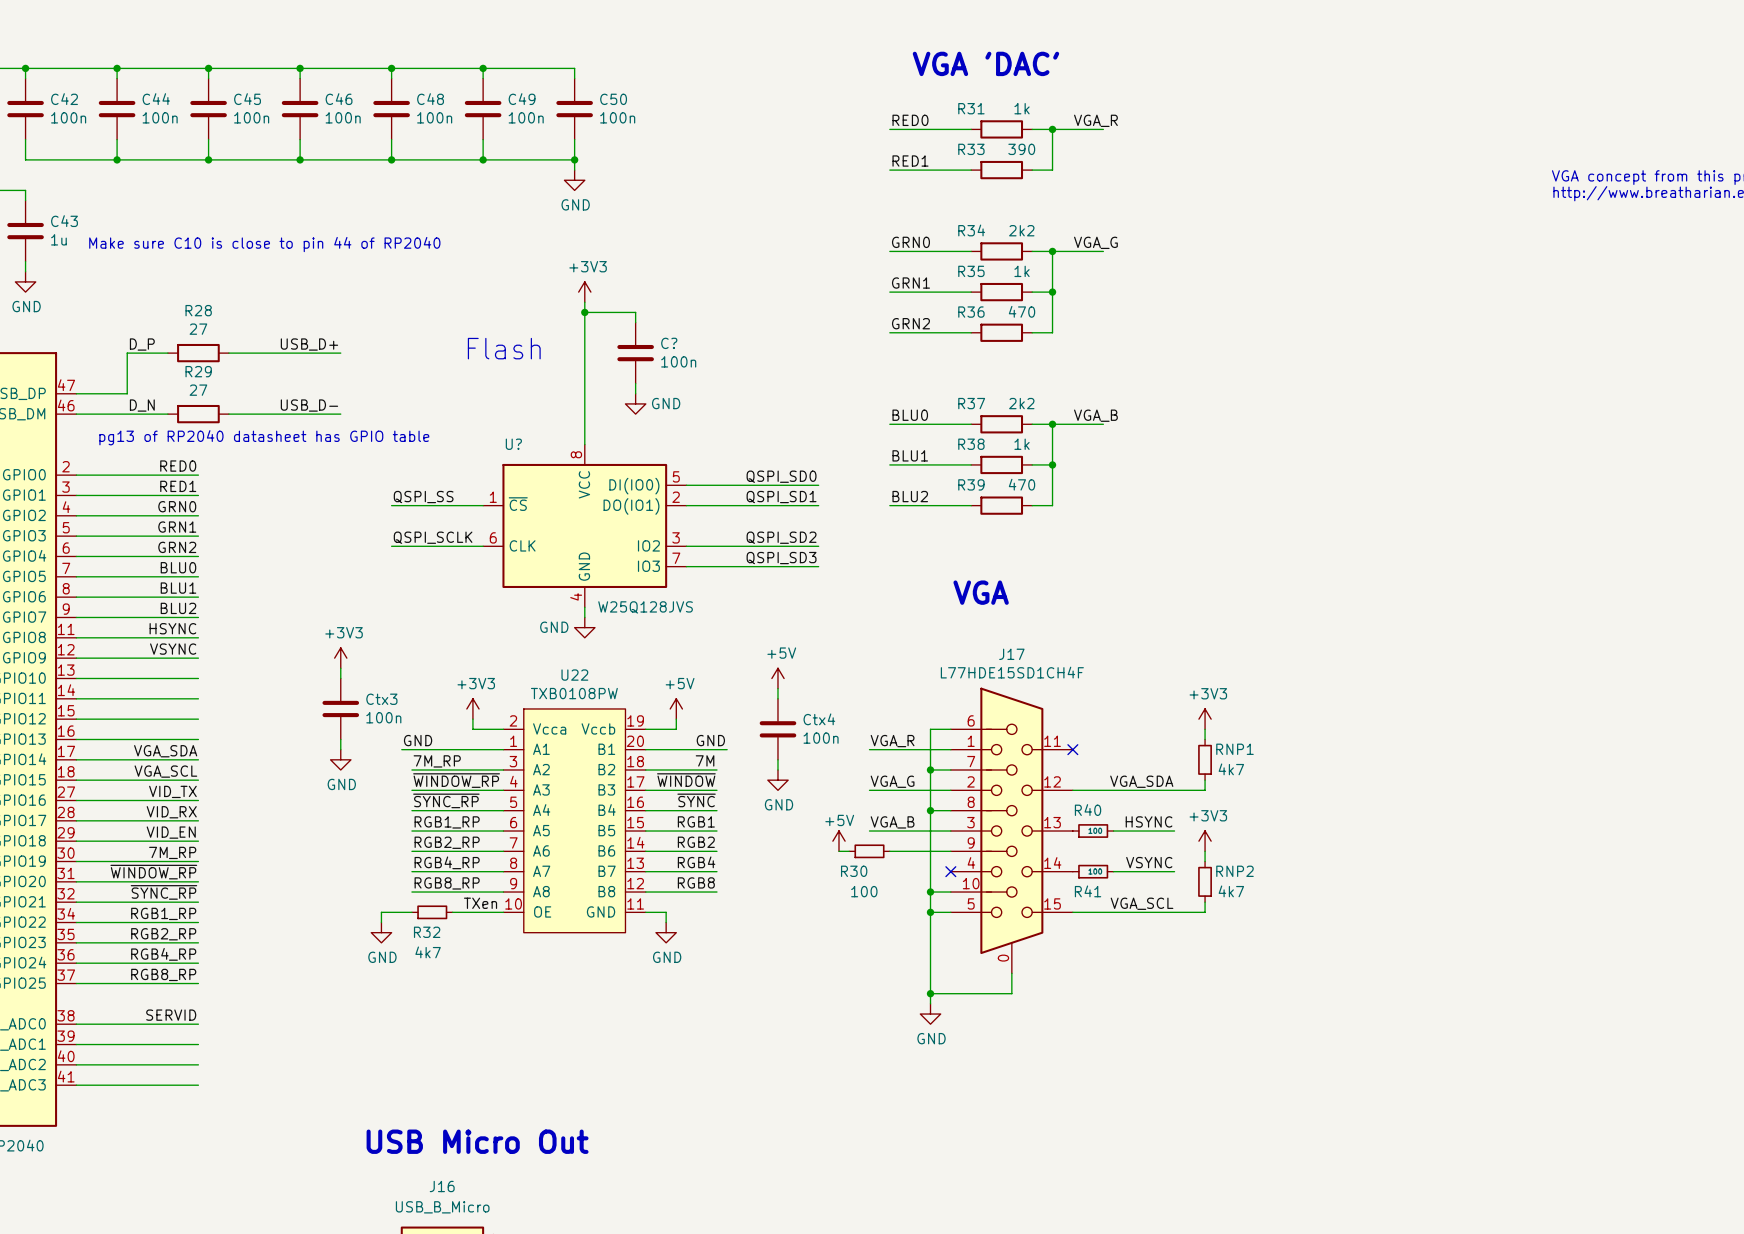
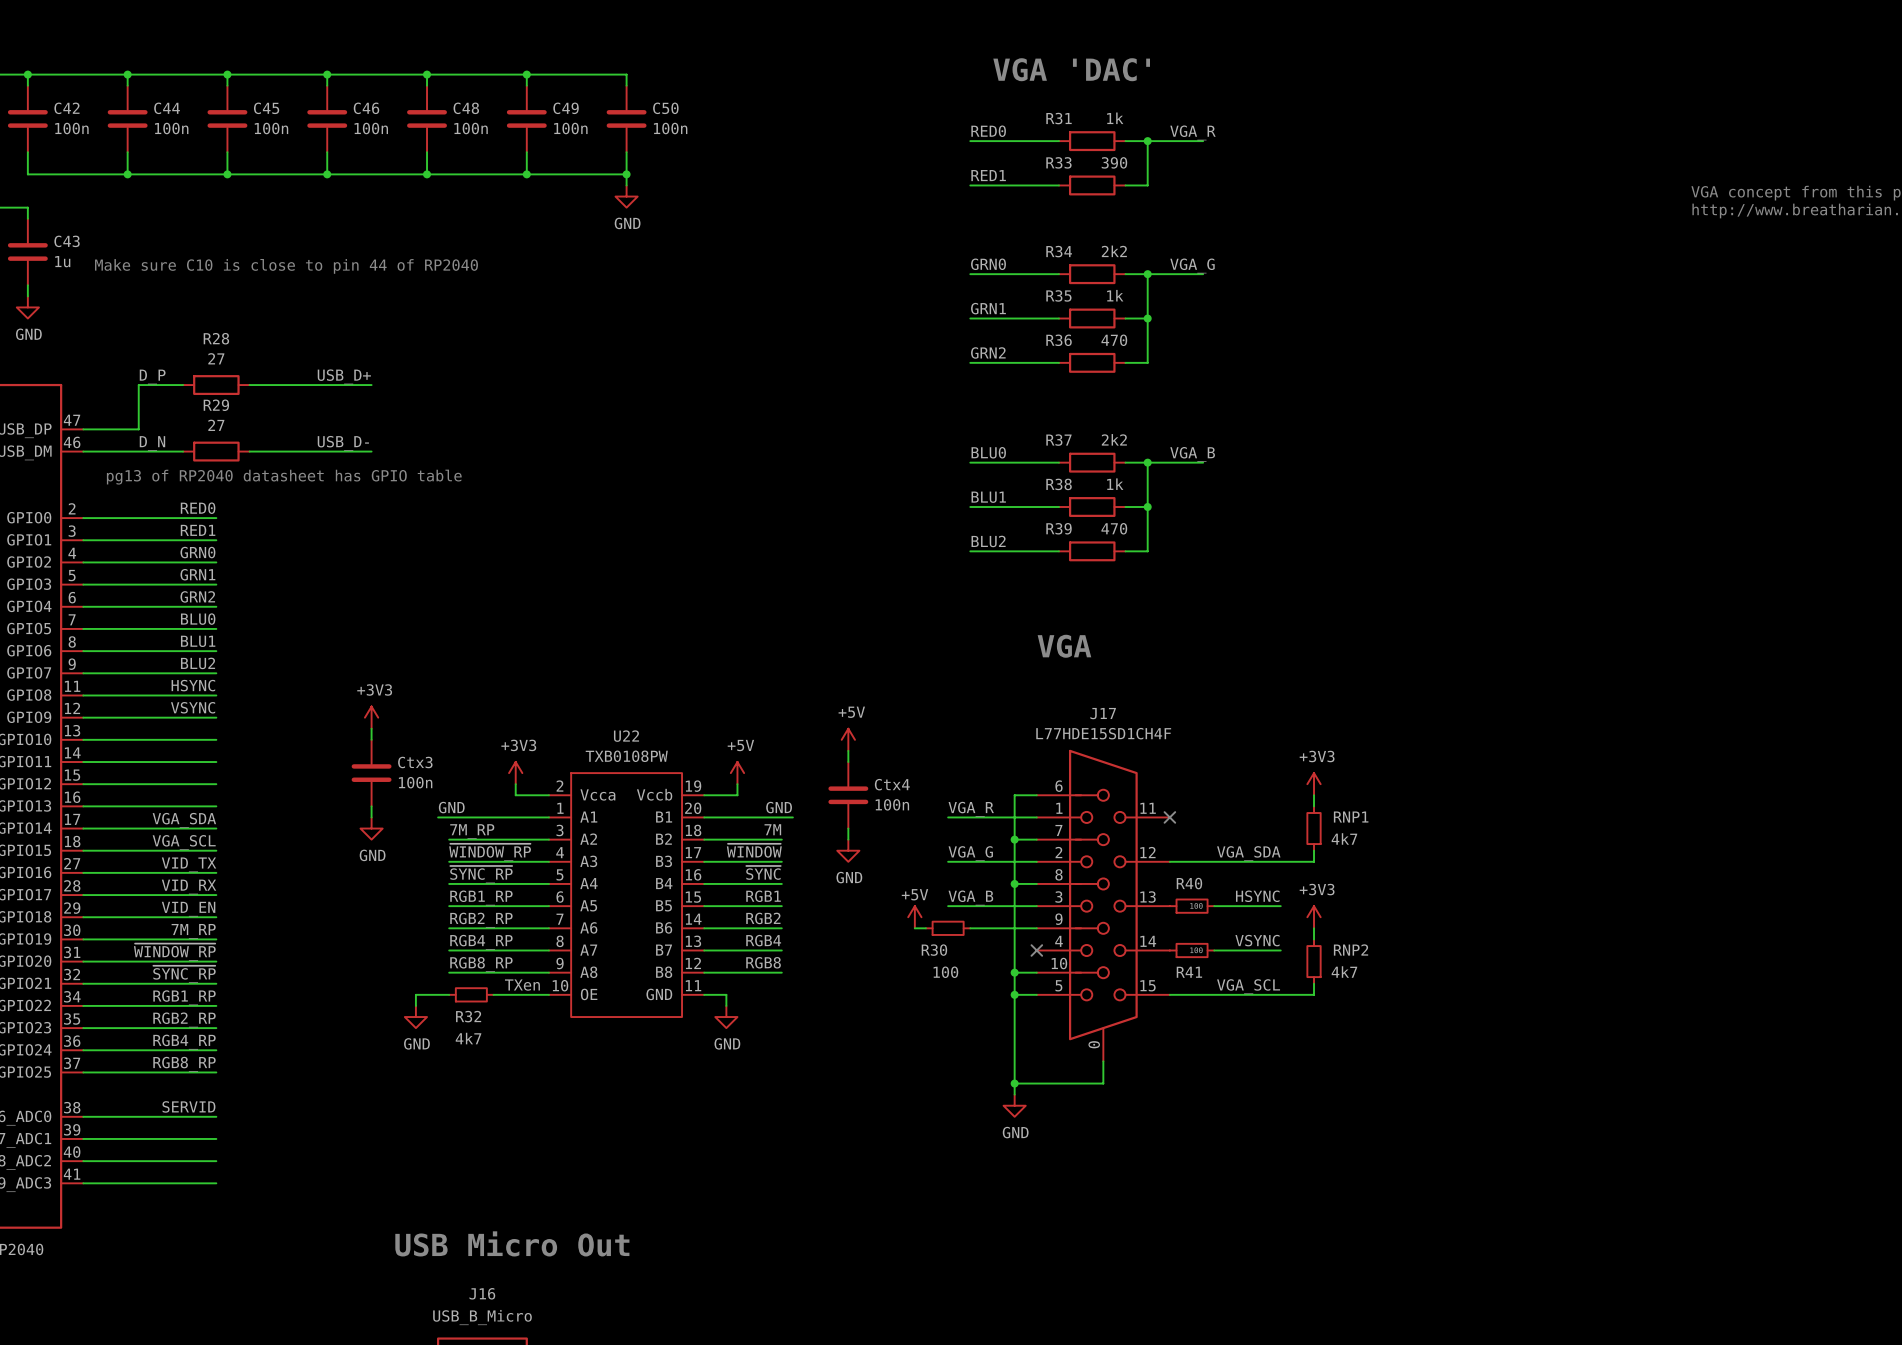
power symbol: +3V3 (584, 292) -> none
wire: (584, 302) (584, 444) -> none
wire: (584, 312) (635, 312) (635, 322) -> none
junction: (584, 312) -> none
text: Flash (504, 348) -> none
C?: 100n (635, 353) -> none
wire: (635, 383) (635, 393) -> none
power symbol: GND (635, 403) -> none
label: QSPI_SD0 (781, 476) -> none
wire: (686, 485) (818, 485) -> none
label: QSPI_SS (423, 497) -> none
label: QSPI_SD1 (781, 497) -> none
wire: (391, 505) (483, 505) -> none
wire: (686, 505) (818, 505) -> none
U?: W25Q128JVS (584, 525) -> none
label: QSPI_SCLK (433, 537) -> none
label: QSPI_SD2 (781, 537) -> none
wire: (391, 546) (483, 546) -> none
wire: (686, 546) (818, 546) -> none
label: QSPI_SD3 (781, 558) -> none
wire: (686, 566) (818, 566) -> none
wire: (584, 607) (584, 617) -> none
power symbol: GND (584, 627) -> none

